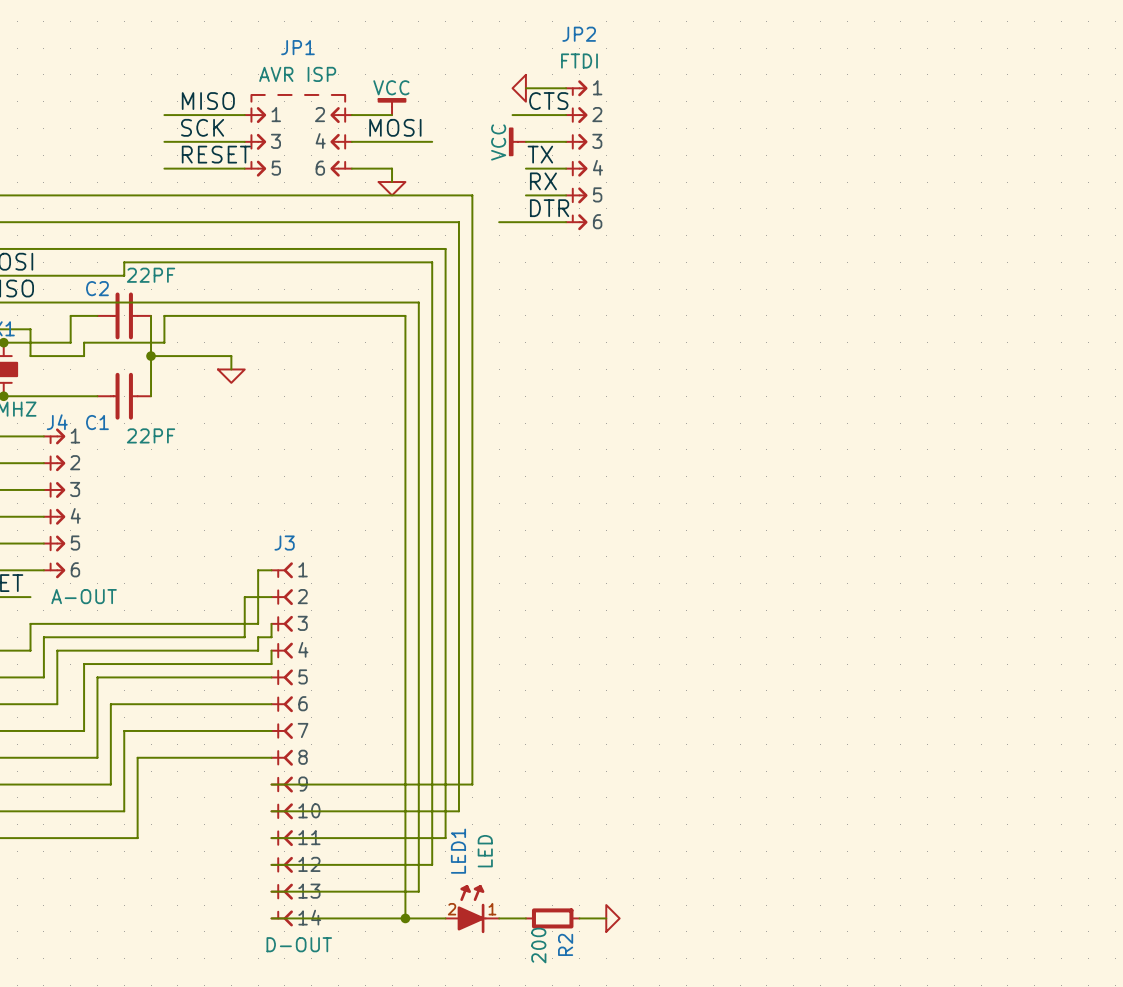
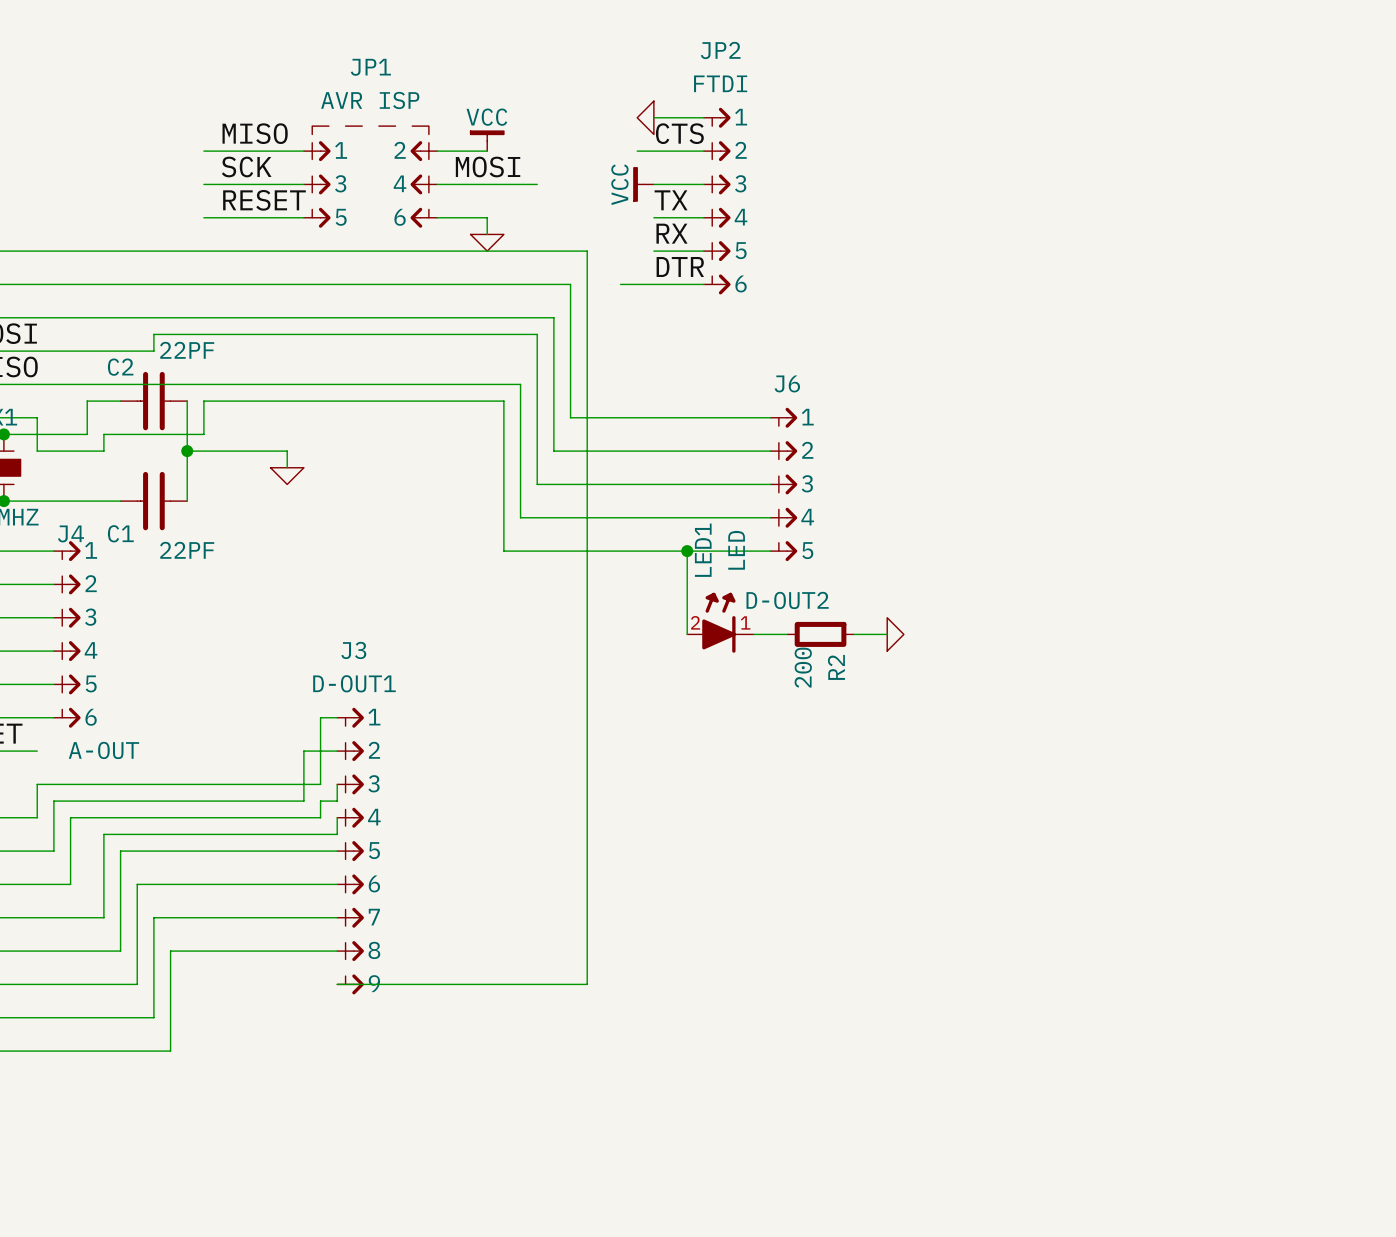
wire: (458, 329) (458, 811) (271, 811) -> (570, 417) (770, 417)
wire: (445, 356) (445, 838) (271, 838) -> (553, 451) (770, 451)
wire: (432, 382) (432, 864) (271, 864) -> (537, 484) (770, 484)
J6: none -> D-OUT2 (783, 484)
wire: (418, 409) (418, 891) (271, 891) -> (520, 517) (770, 517)
wire: (405, 436) (405, 918) -> (503, 551) (770, 551)
wire: none -> (687, 551) (687, 634)
junction: none -> (687, 551)
wire: none -> (753, 634) (787, 634)
wire: none -> (853, 634) (887, 634)
power symbol: none -> (895, 634)
J3 name position: J3 (284, 543) -> J3 (353, 650)
J3 symbol: [271, 562, 293, 927] -> [337, 707, 364, 995]
LED1 position: (472, 909) -> (720, 622)
wire: (271, 918) (445, 918) -> none
junction: (405, 918) -> none
wire: (499, 918) (525, 918) -> none
R2 position: (552, 918) -> (820, 634)
wire: (579, 918) (606, 918) -> none
power symbol: (612, 918) -> none
J3 value: D-OUT (299, 944) -> D-OUT1 (354, 683)

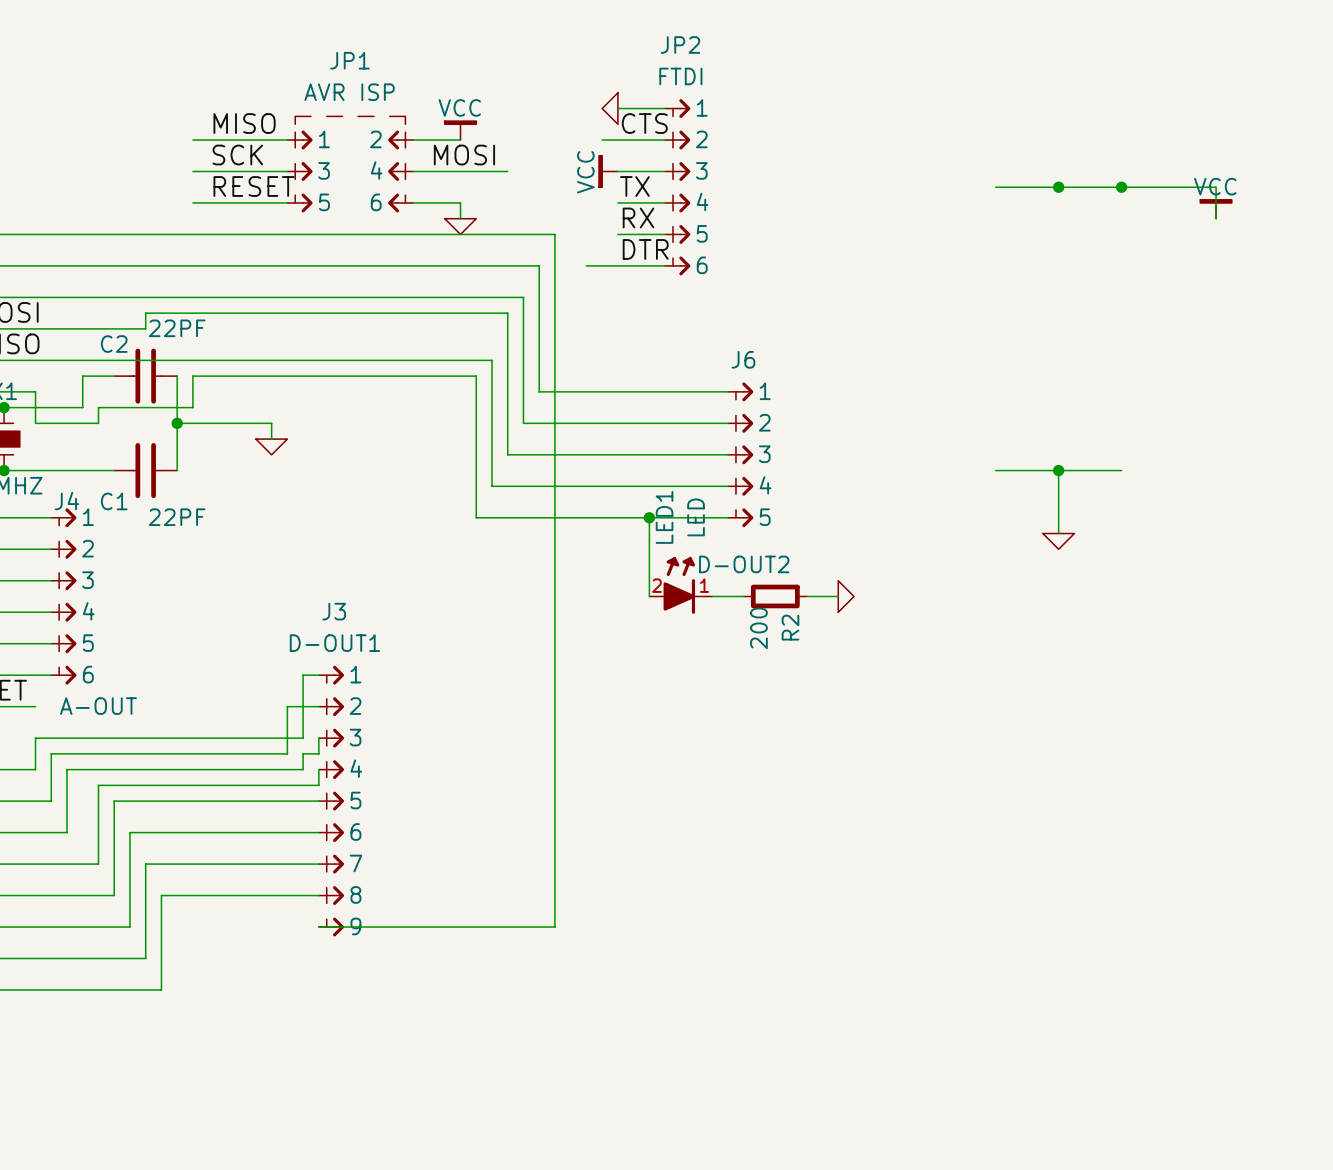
wire: none -> (995, 187) (1216, 187) (1216, 218)
junction: none -> (1058, 187)
junction: none -> (1121, 187)
power symbol: none -> VCC (1216, 209)
wire: none -> (995, 470) (1121, 470)
wire: none -> (1058, 470) (1058, 533)
junction: none -> (1058, 470)
power symbol: none -> (1058, 541)

